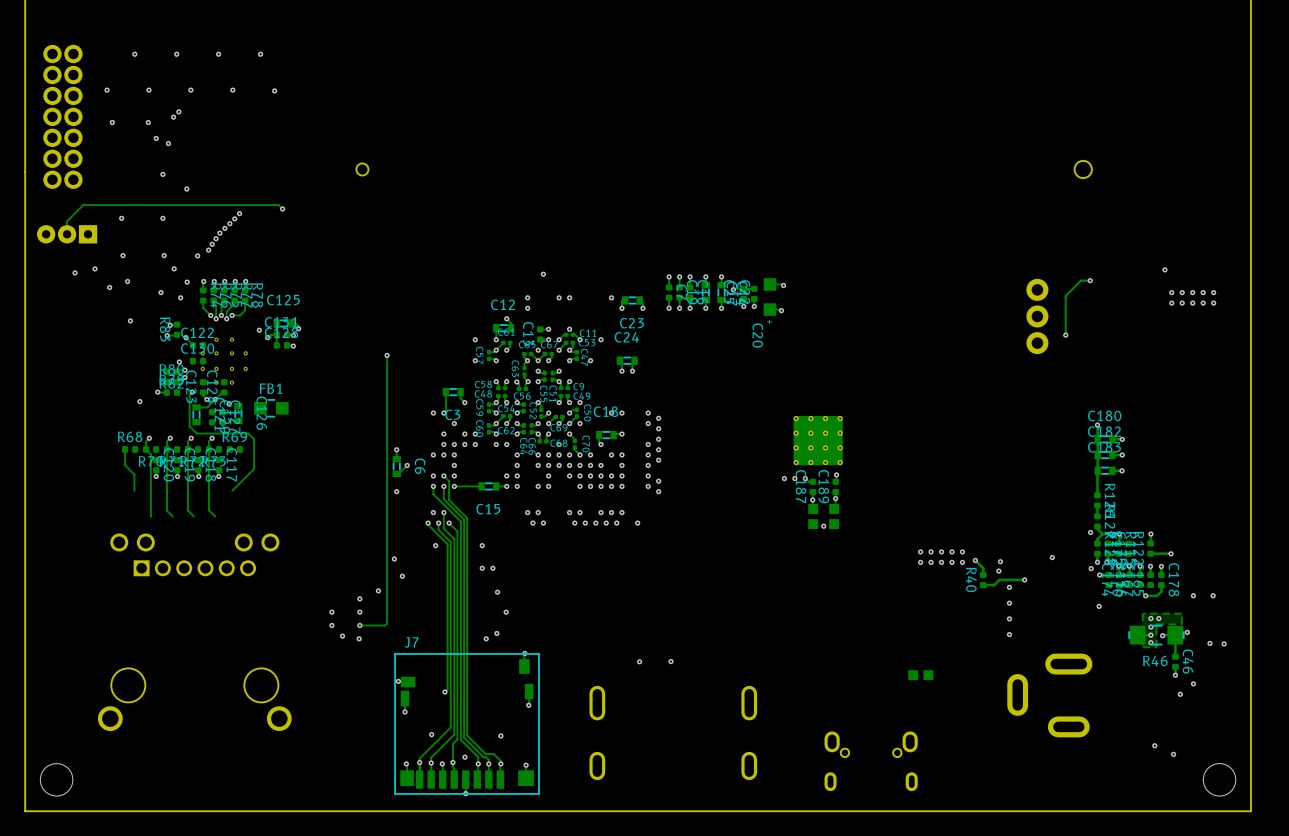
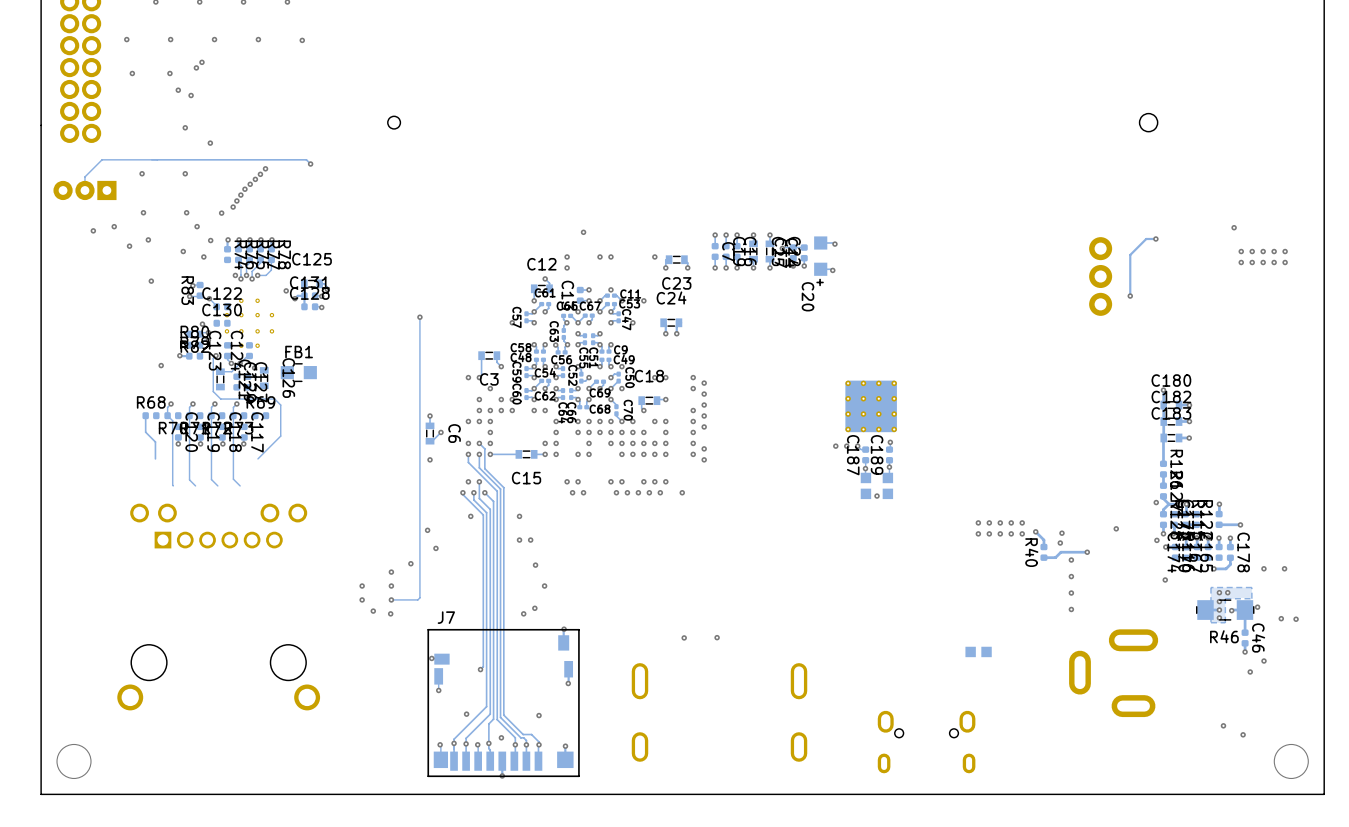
track: (203, 300) (203, 307) (210, 315) -> none
via: (475, 339) -> none

